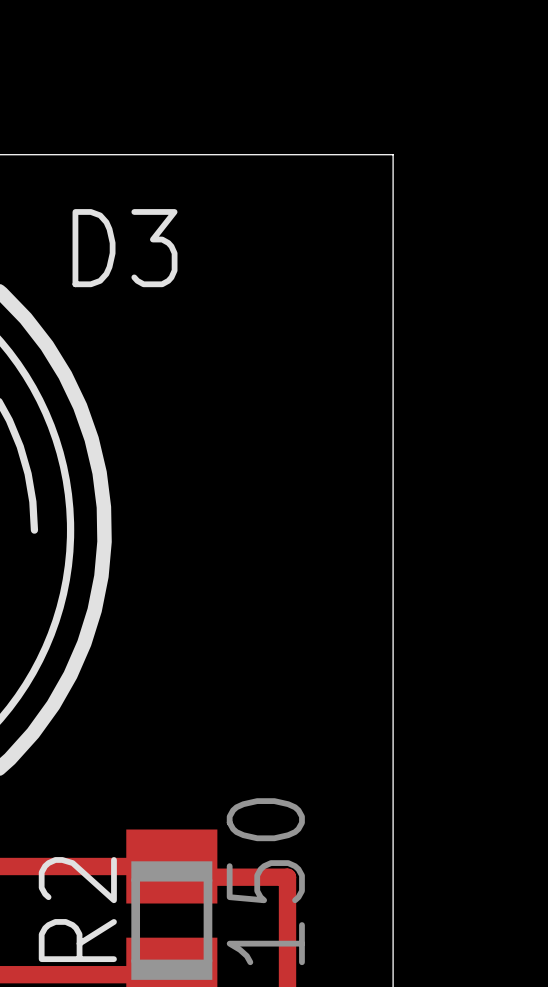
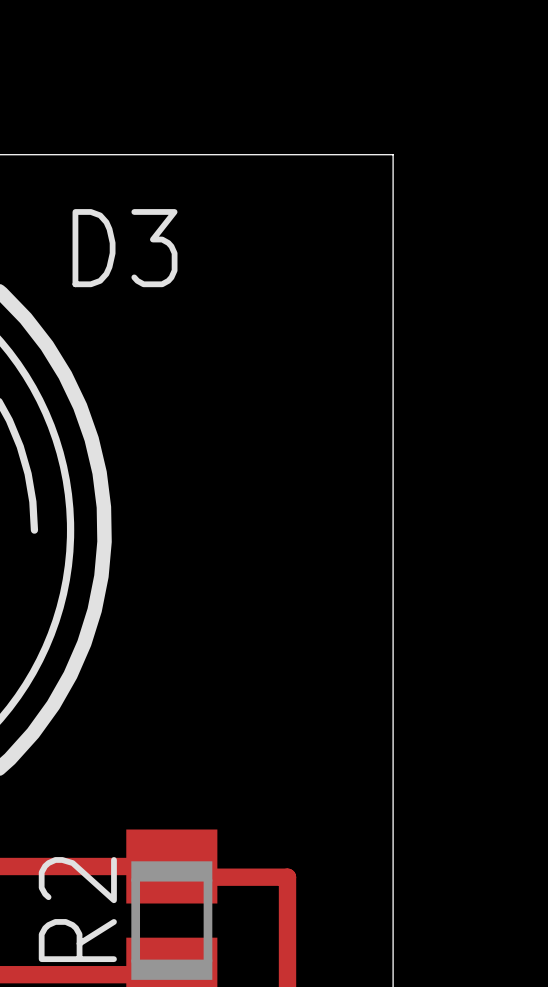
R2 value: 150 (265, 881) -> none

